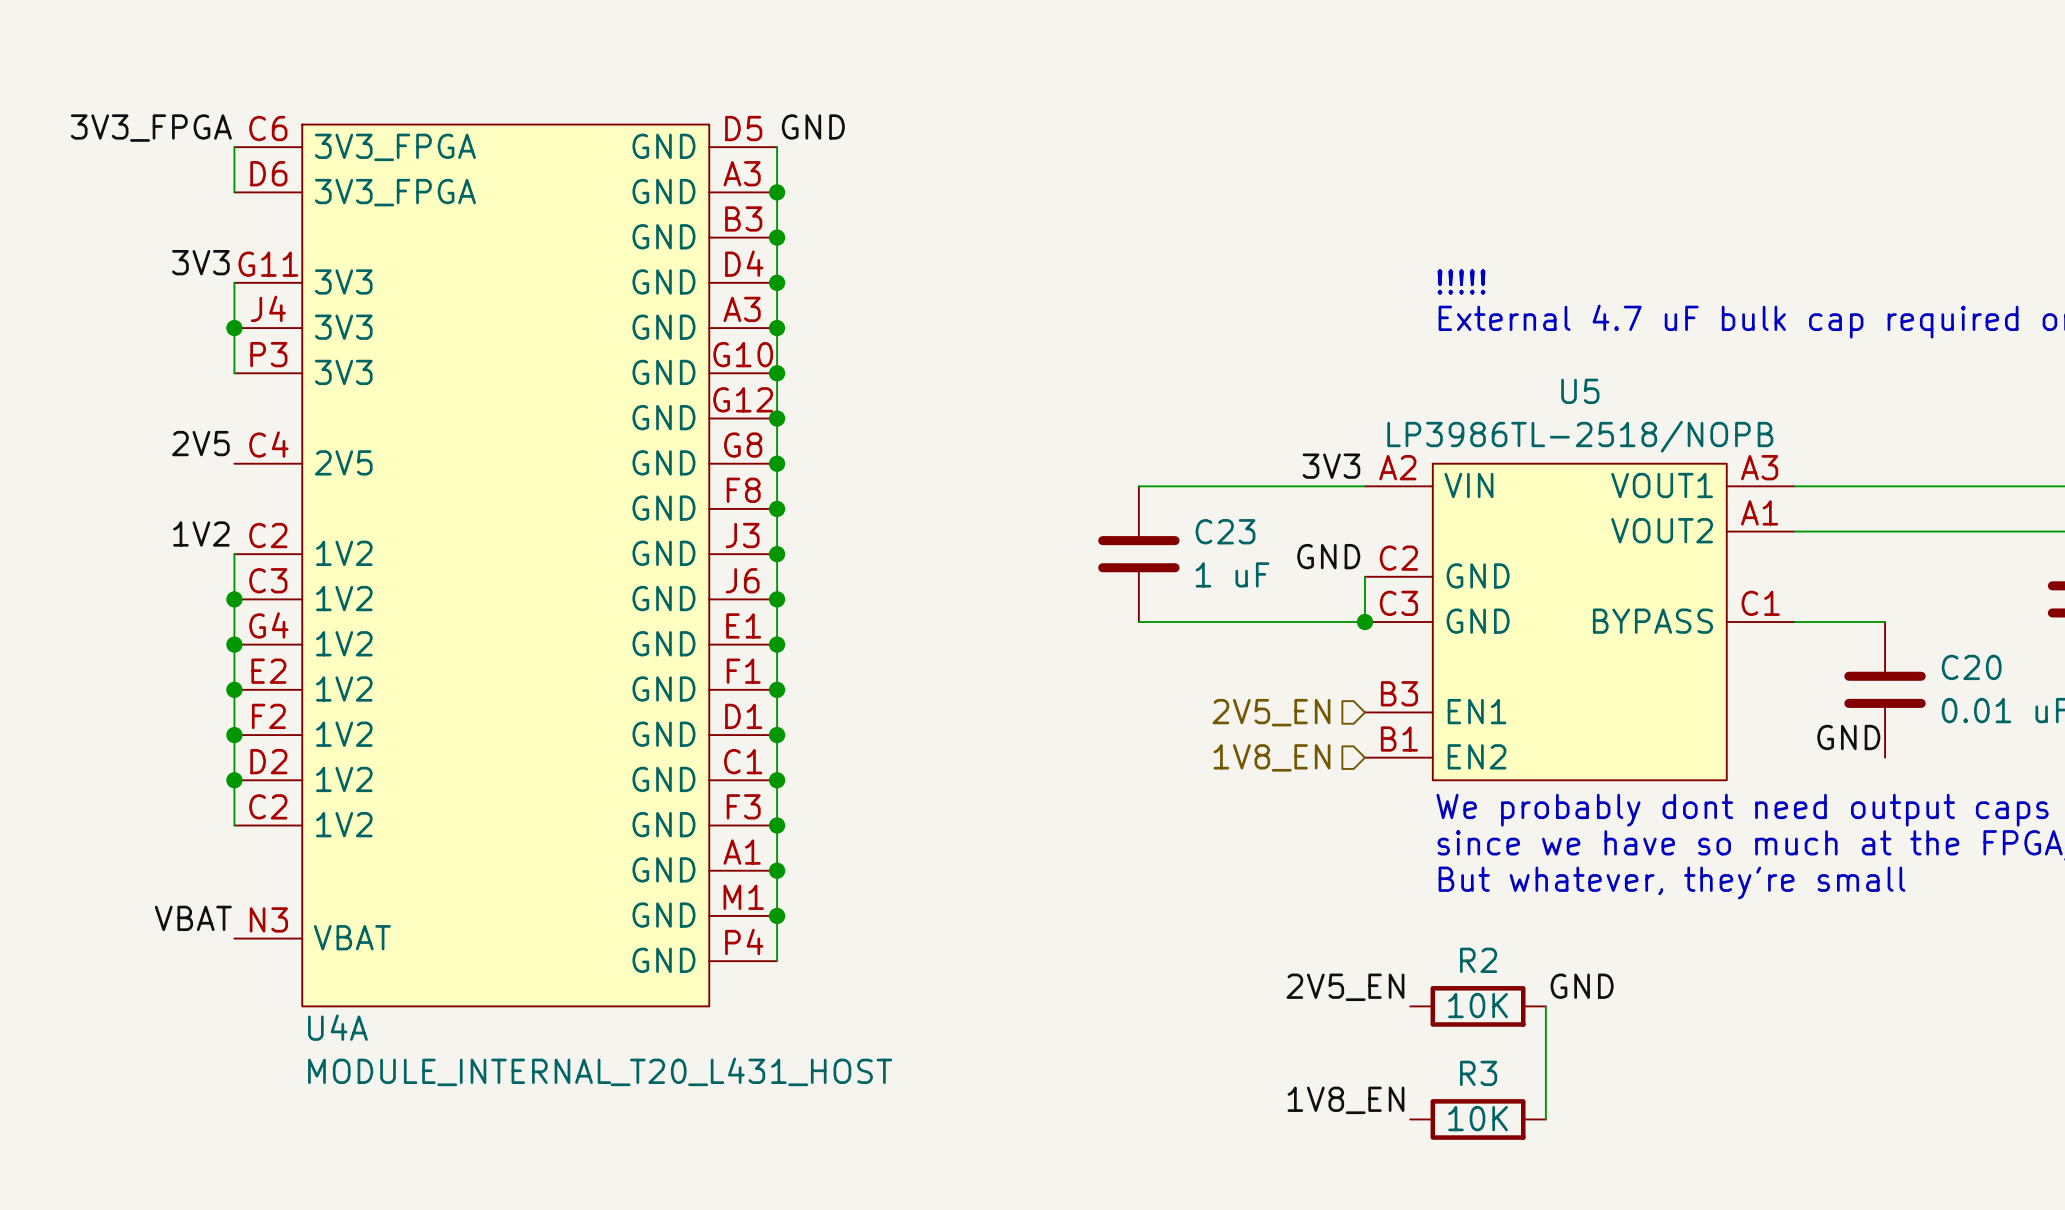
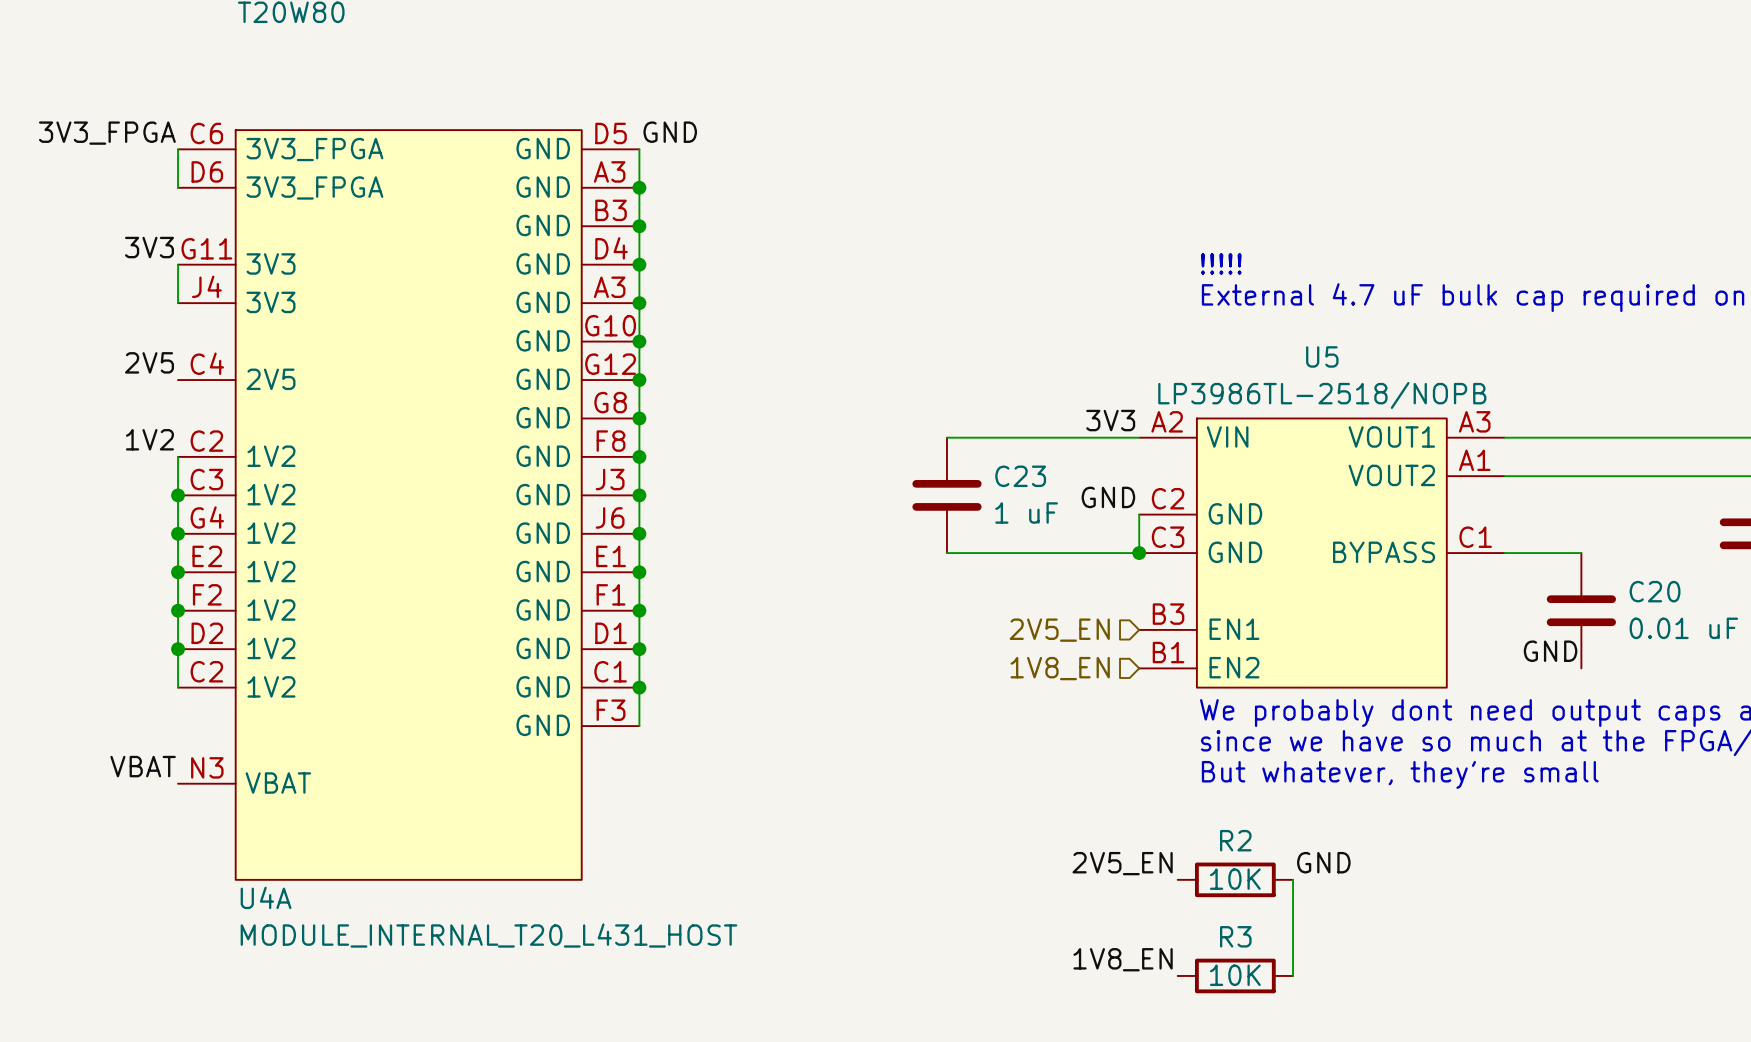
U4A symbol: [234, 124, 778, 1007] -> [178, 130, 640, 880]
wire: (234, 328) (234, 373) -> (178, 456) (178, 495)
junction: (234, 328) -> none
label position: 2V5 (200, 443) -> 2V5 (149, 362)
label position: 1V2 (201, 533) -> 1V2 (149, 439)
junction: none -> (178, 495)
wire: (234, 780) (234, 825) -> none
junction: (234, 780) -> none
wire: (777, 825) (777, 961) -> none
junction: (777, 825) -> none
junction: (777, 870) -> none
junction: (777, 915) -> none
label position: VBAT (193, 918) -> VBAT (143, 766)

